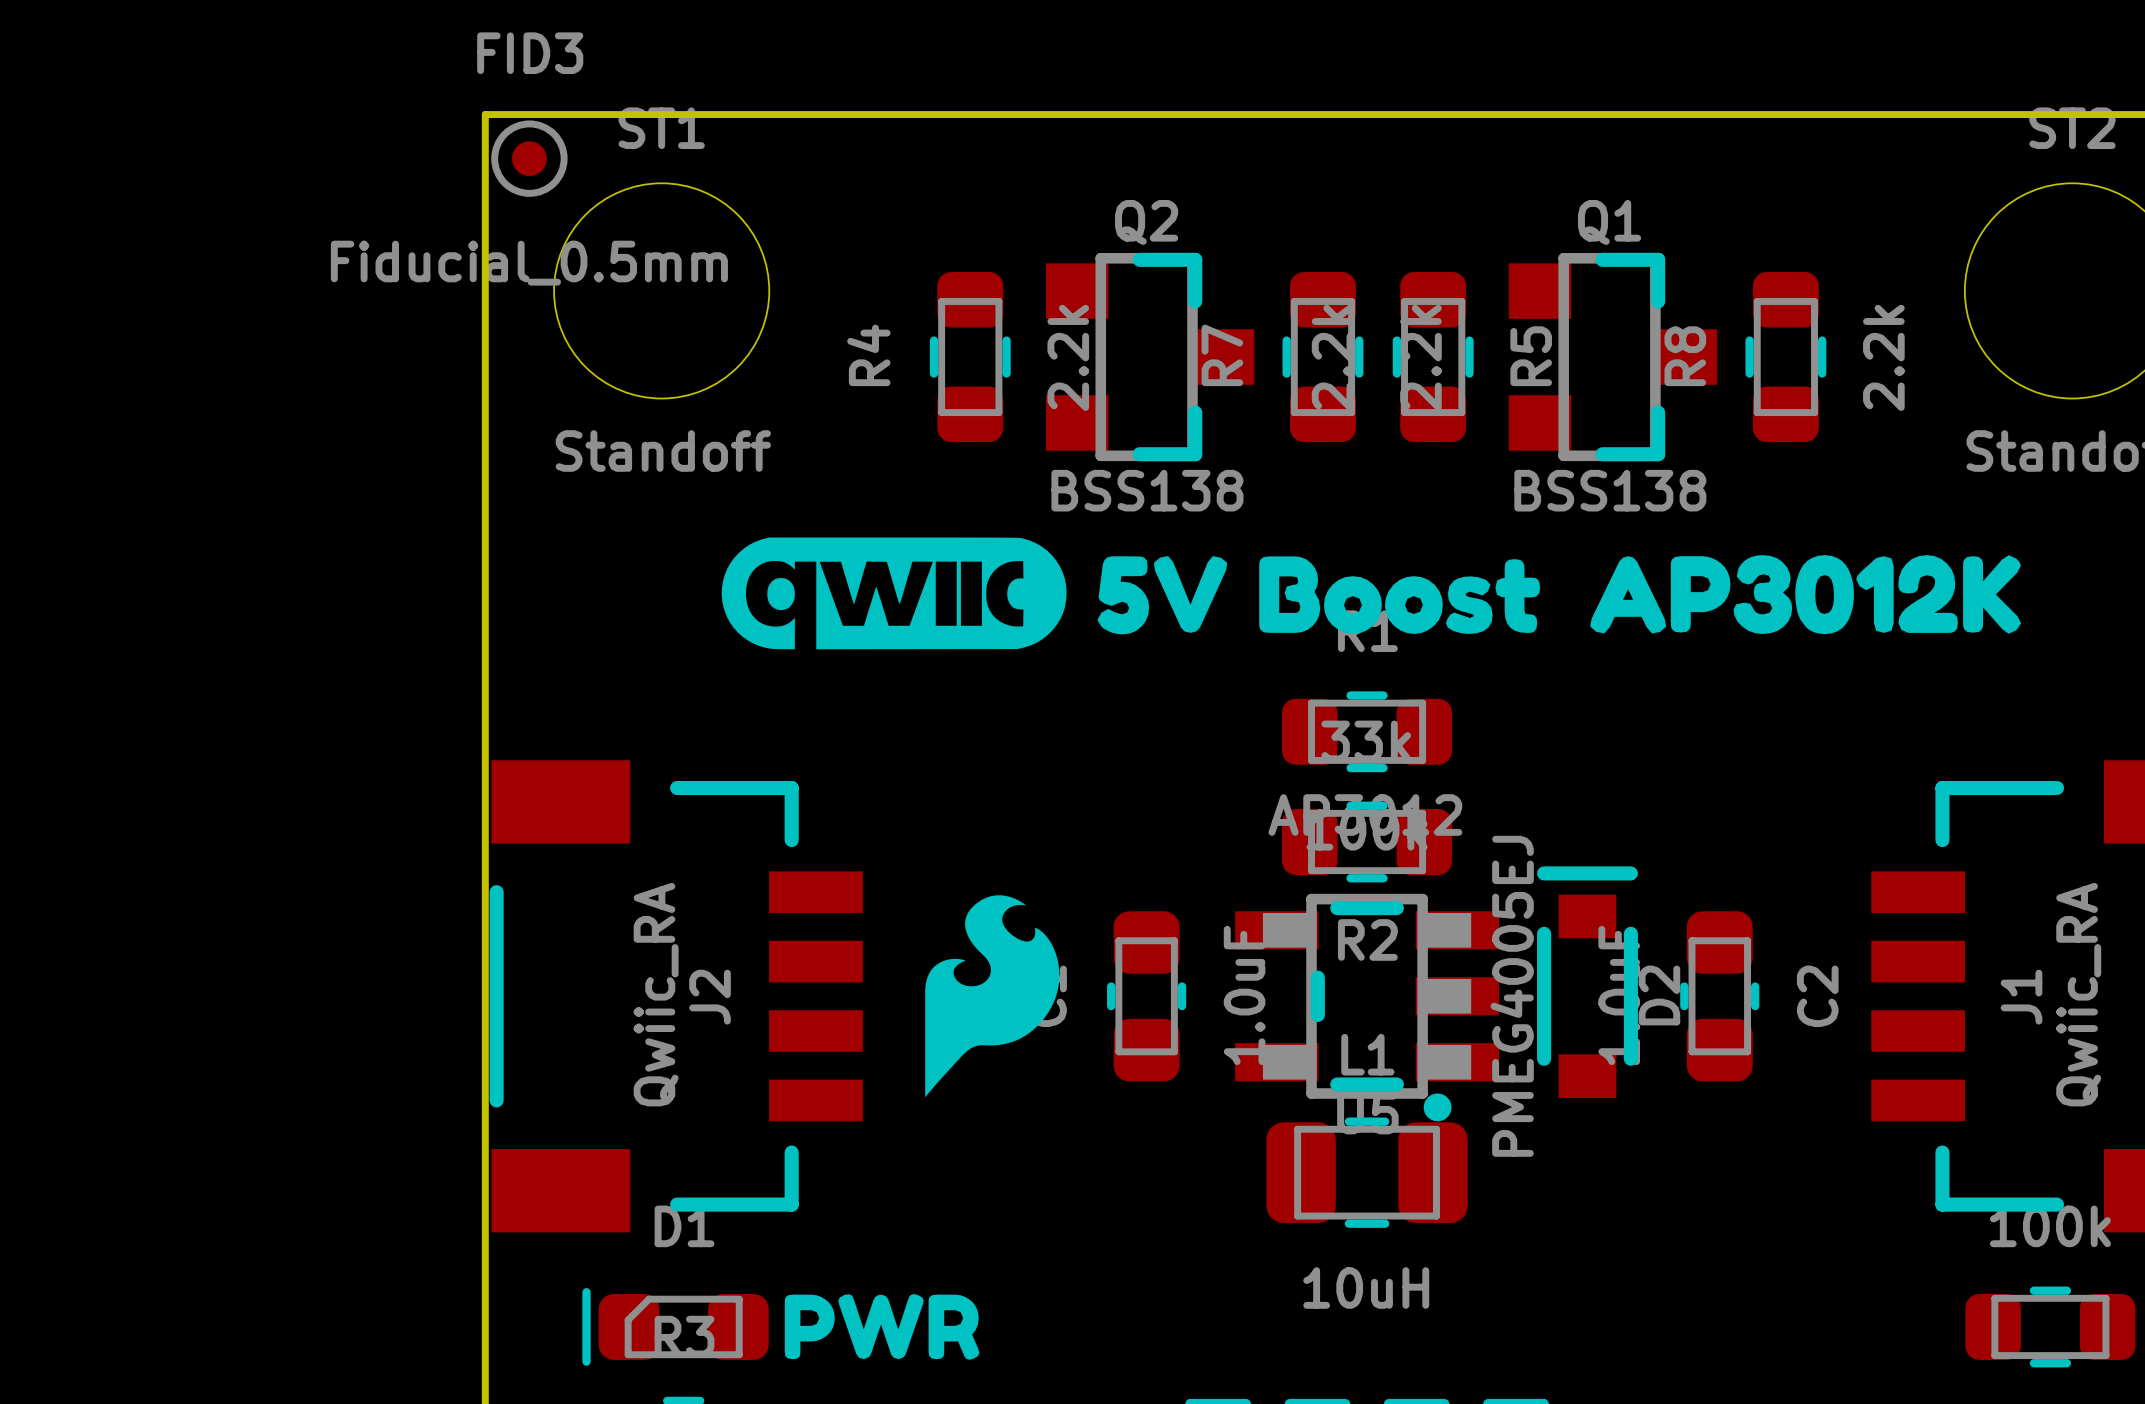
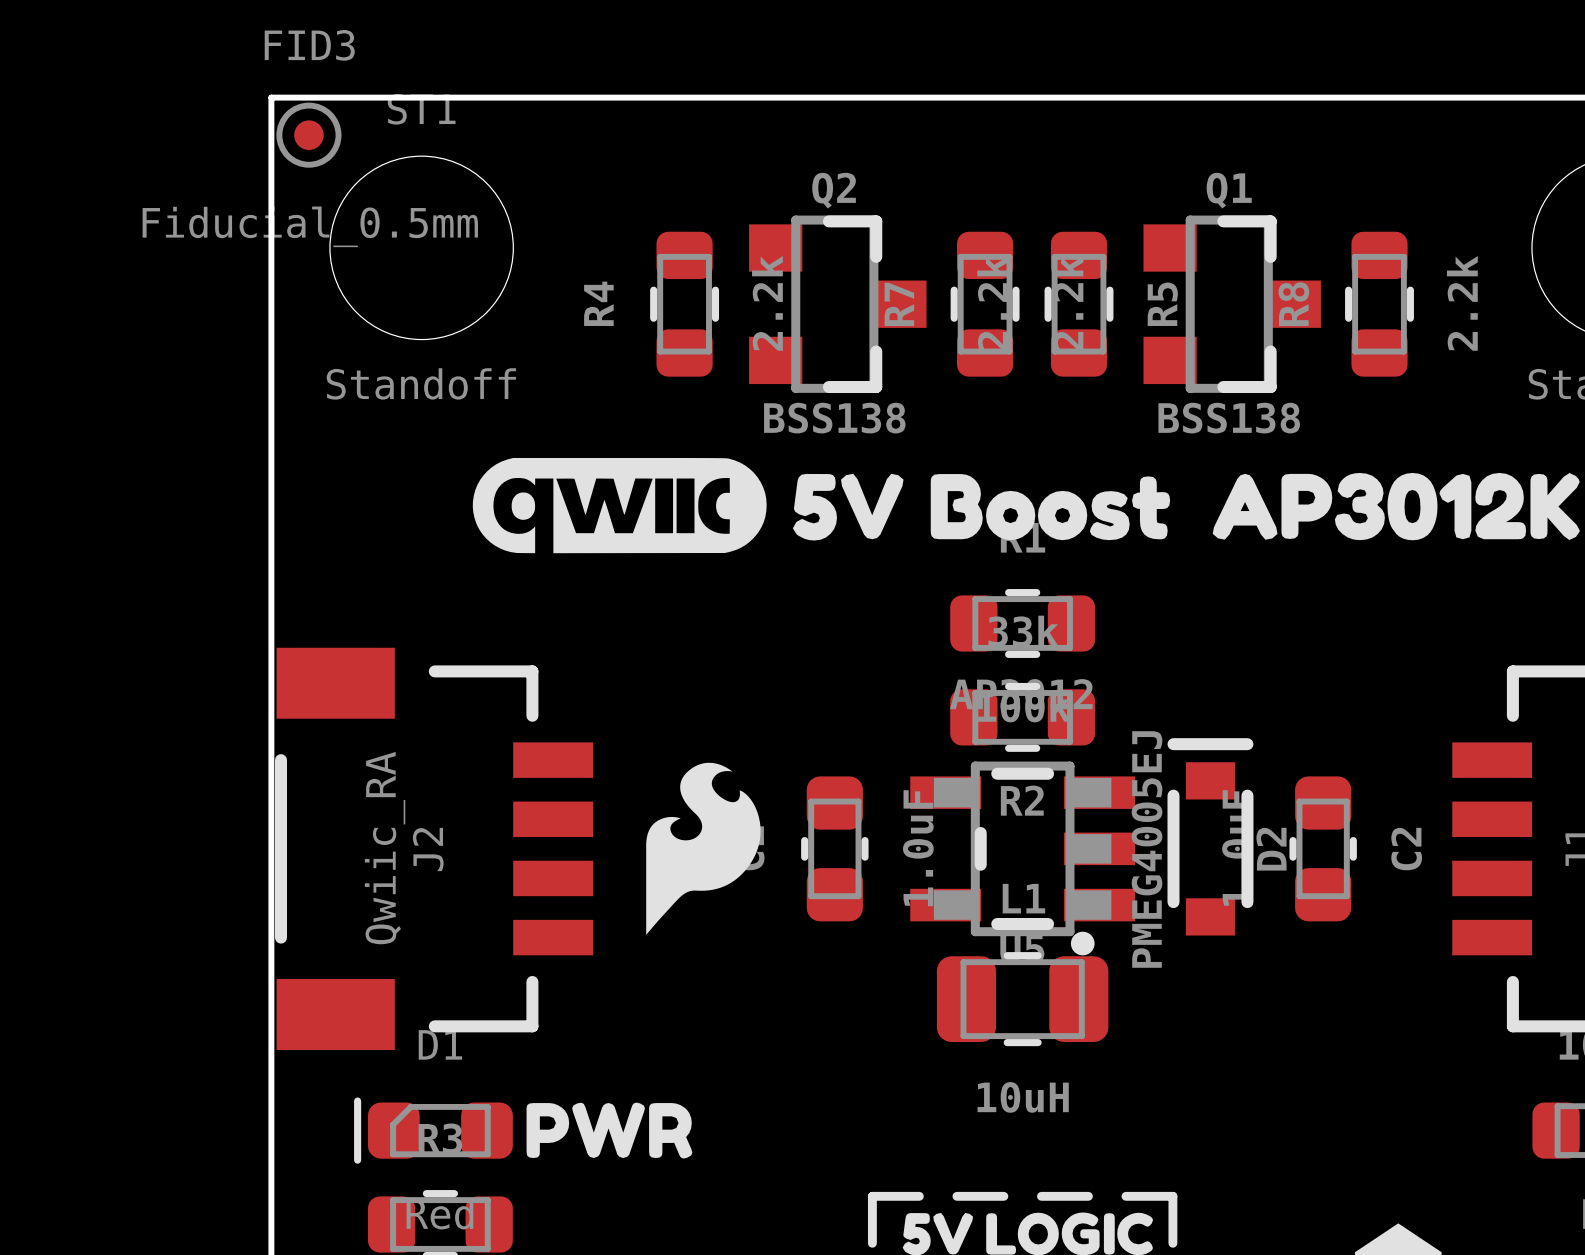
J2 value position: Qwiic_RA (656, 994) -> Qwiic_RA (385, 848)
J2 name position: J2 (710, 997) -> J2 (428, 849)

